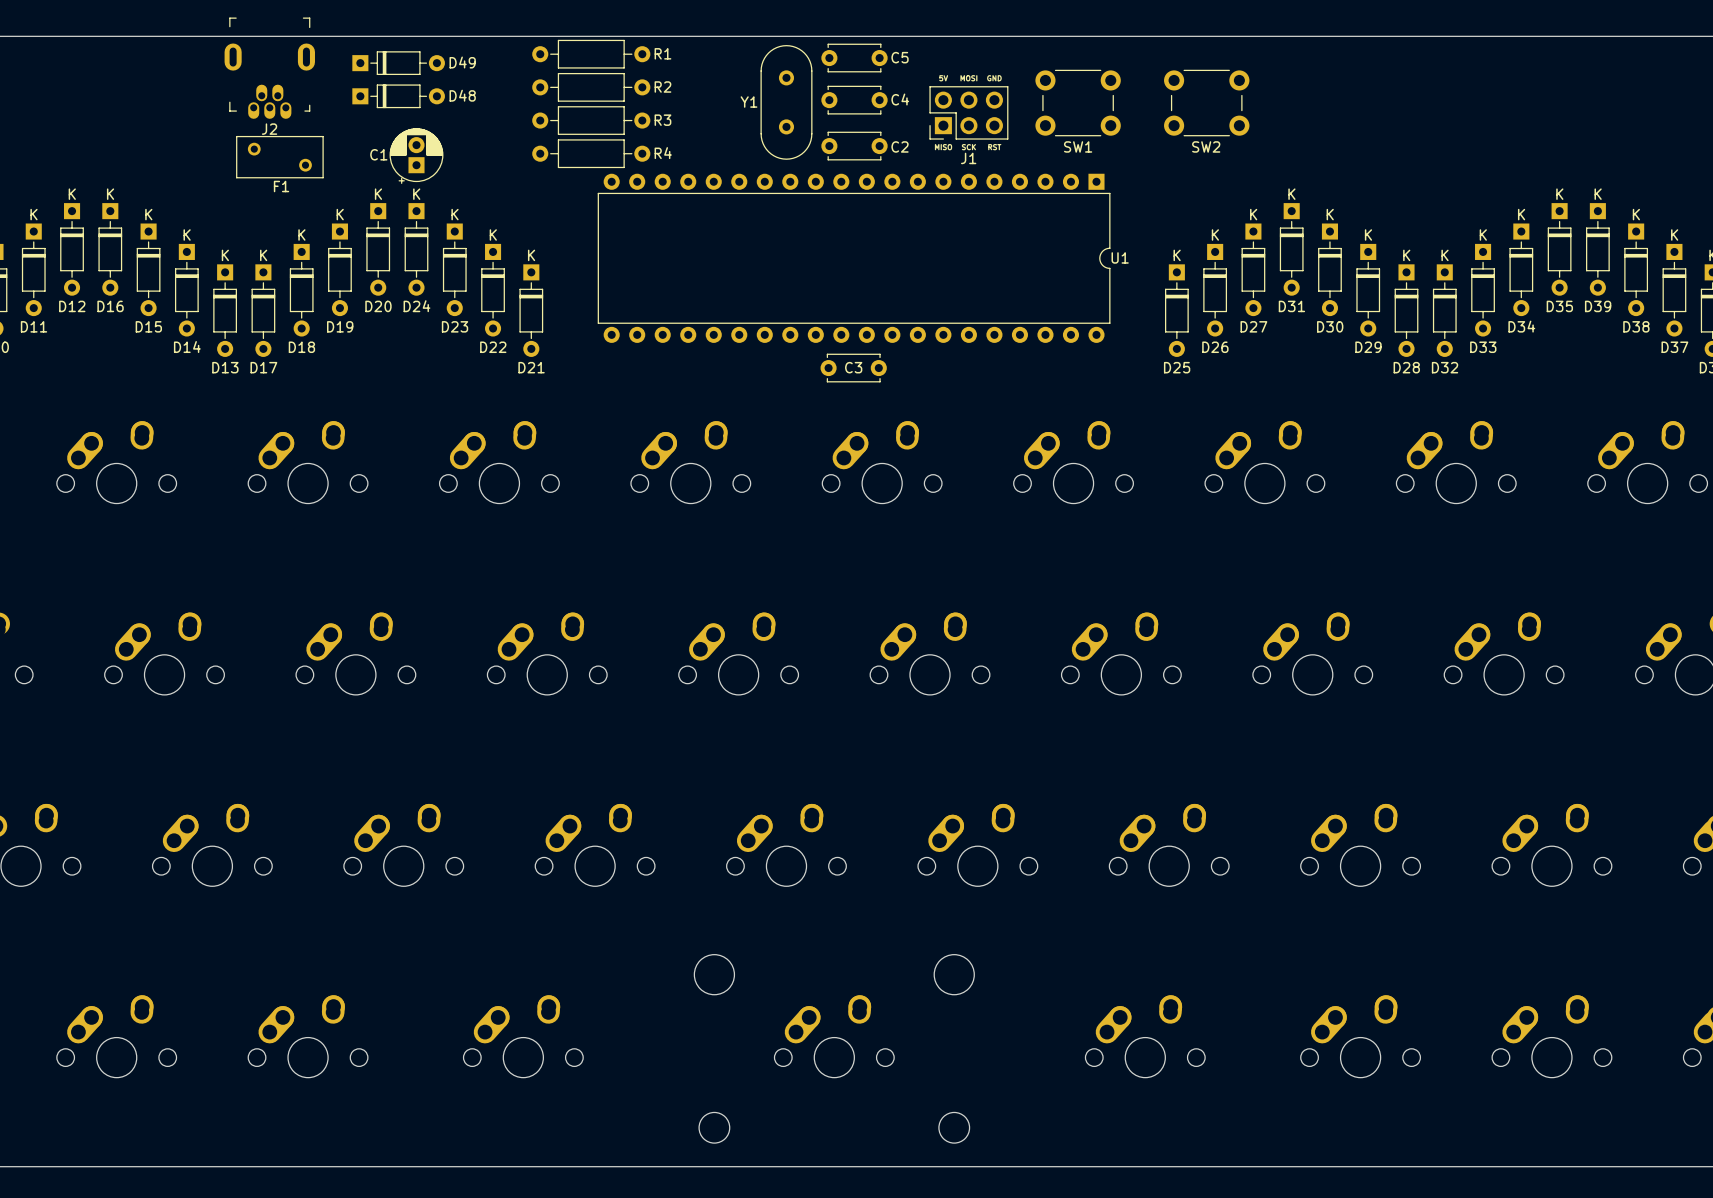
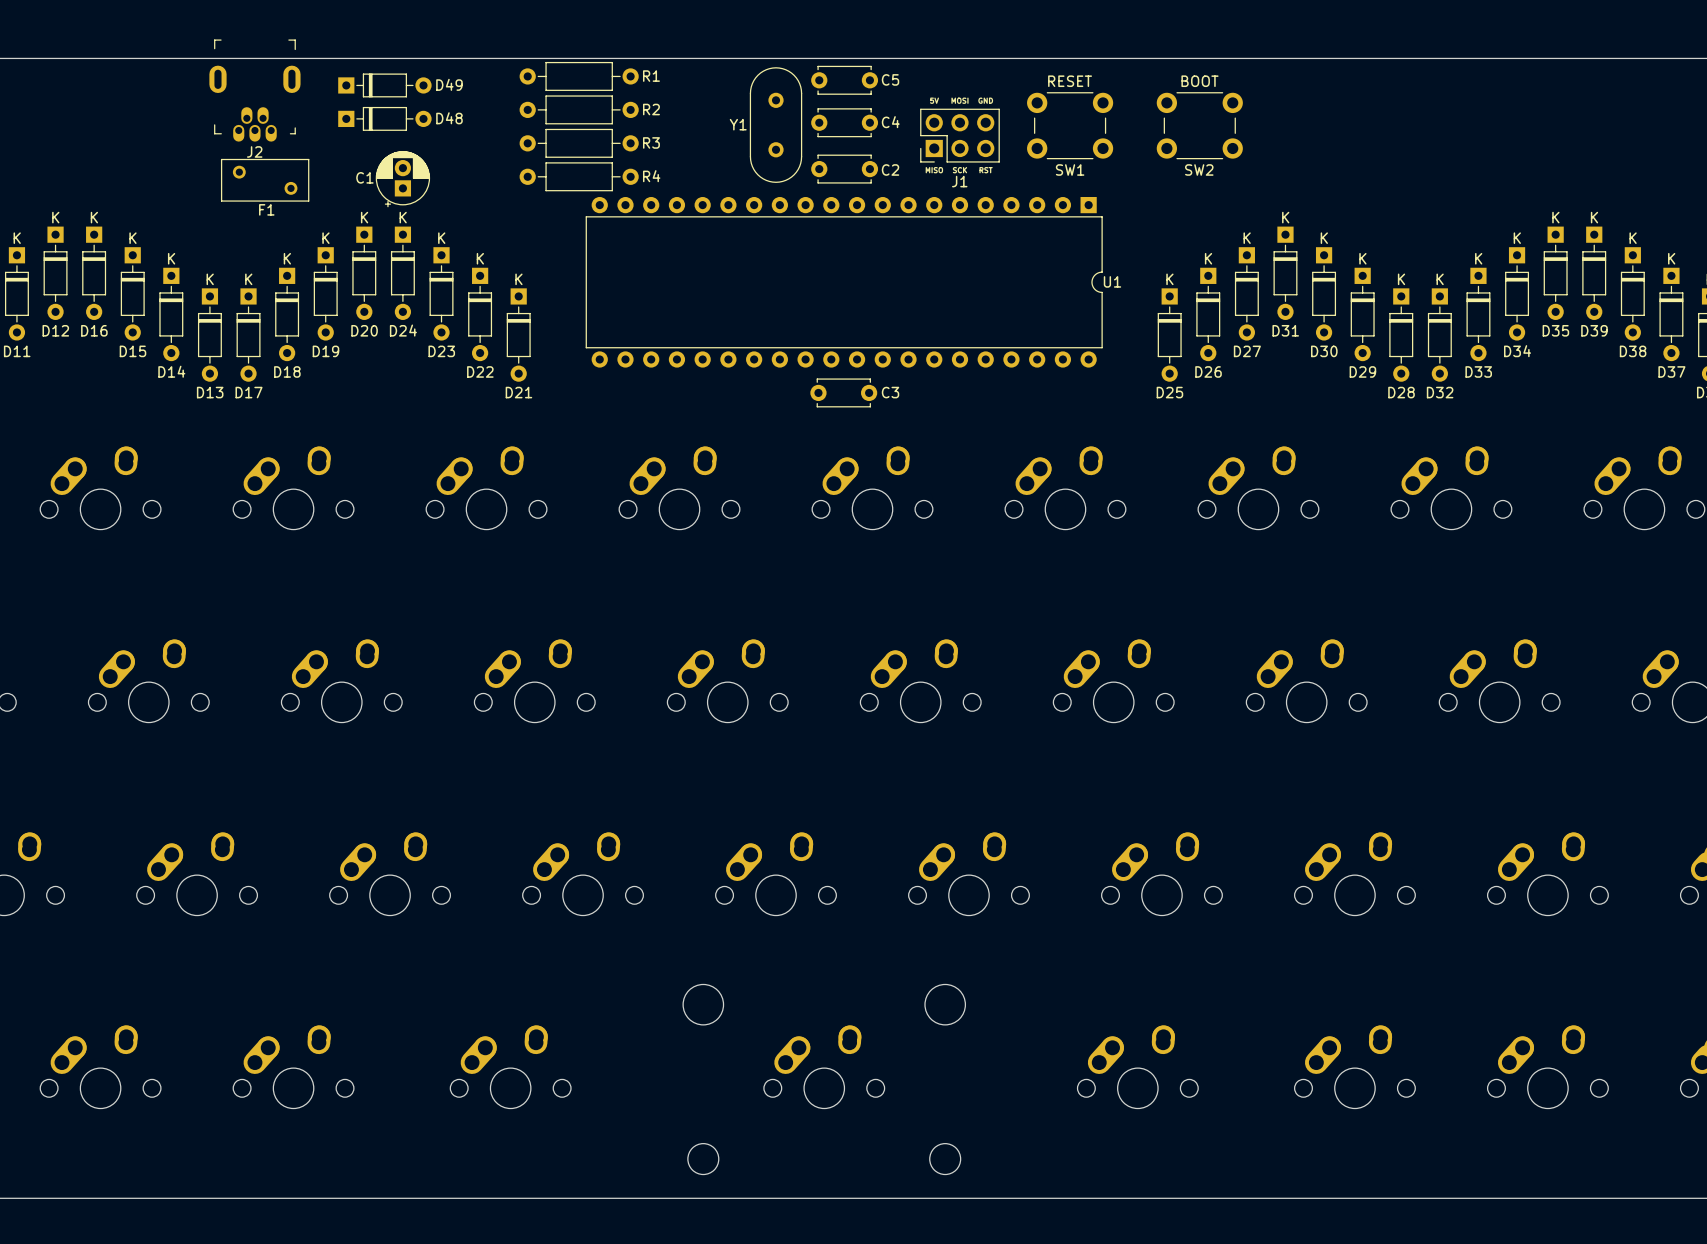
text: none -> RESET (1070, 81)
text: none -> BOOT (1200, 81)
C3 name position: C3 (853, 367) -> C3 (890, 392)

